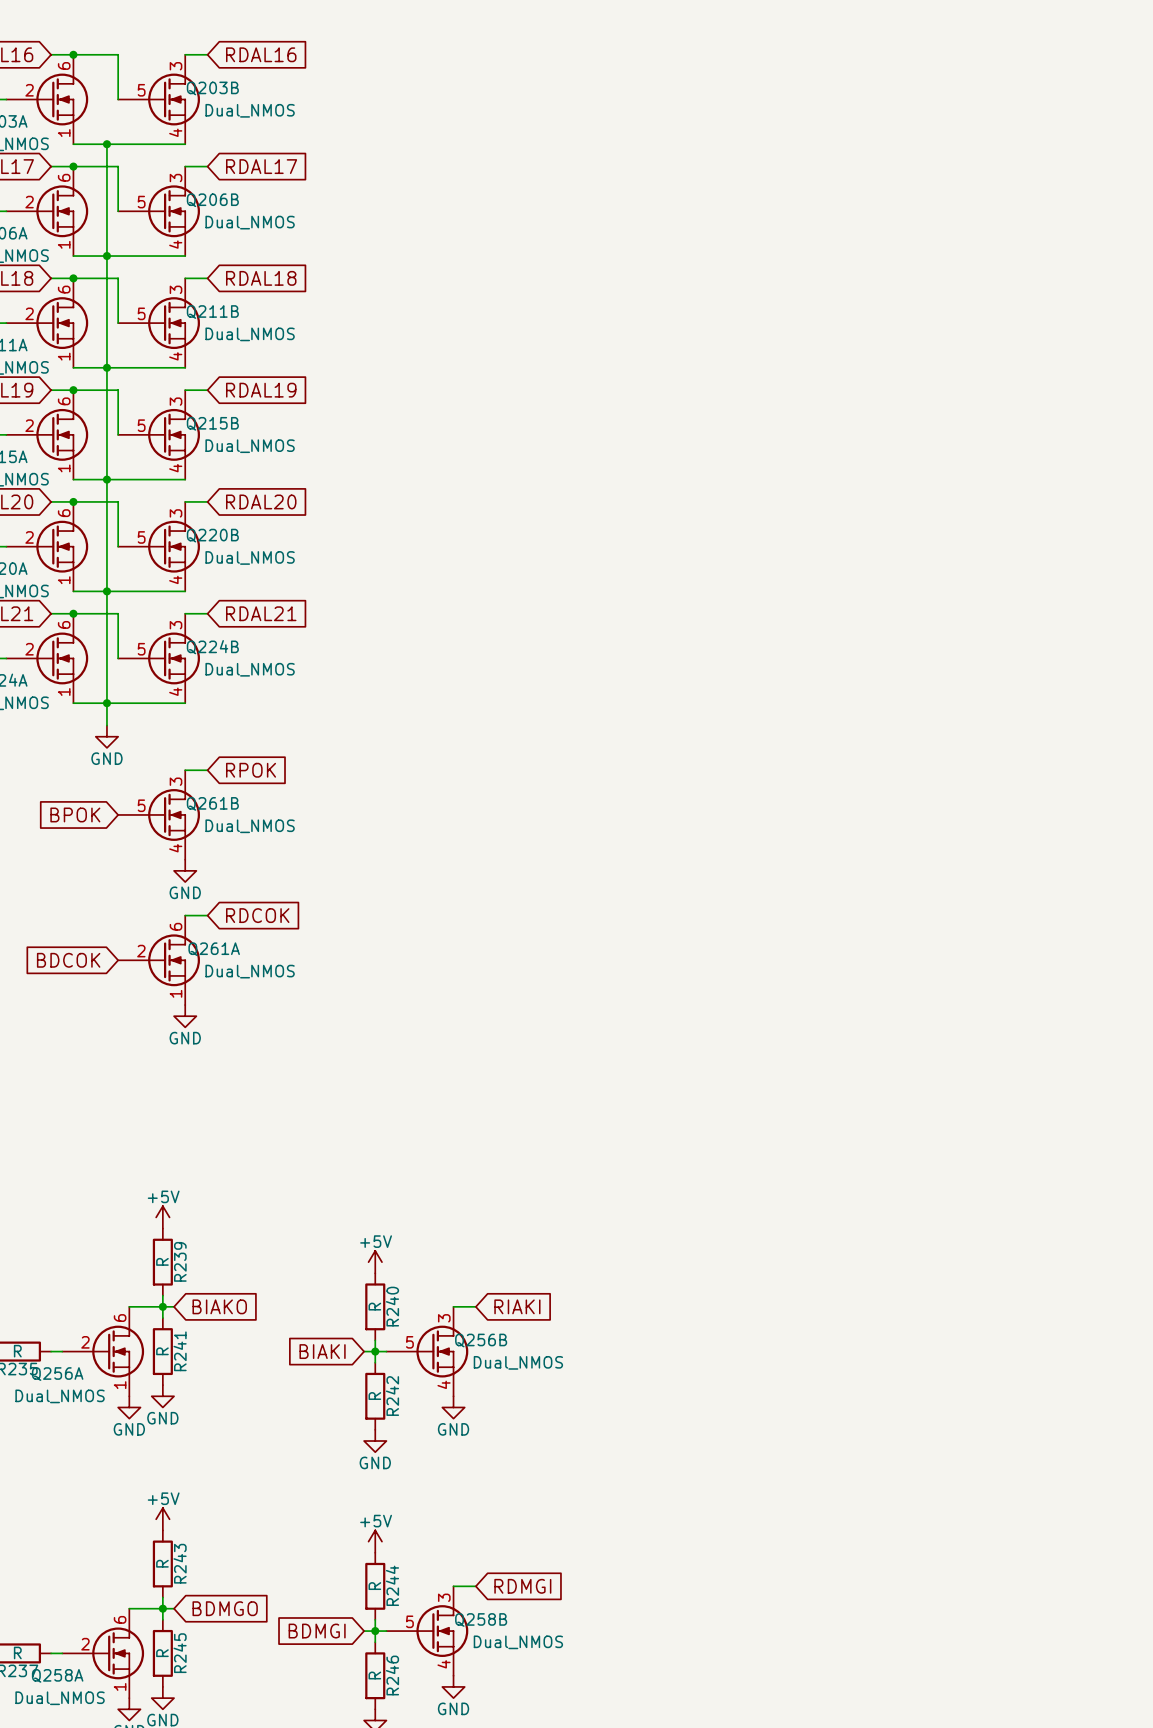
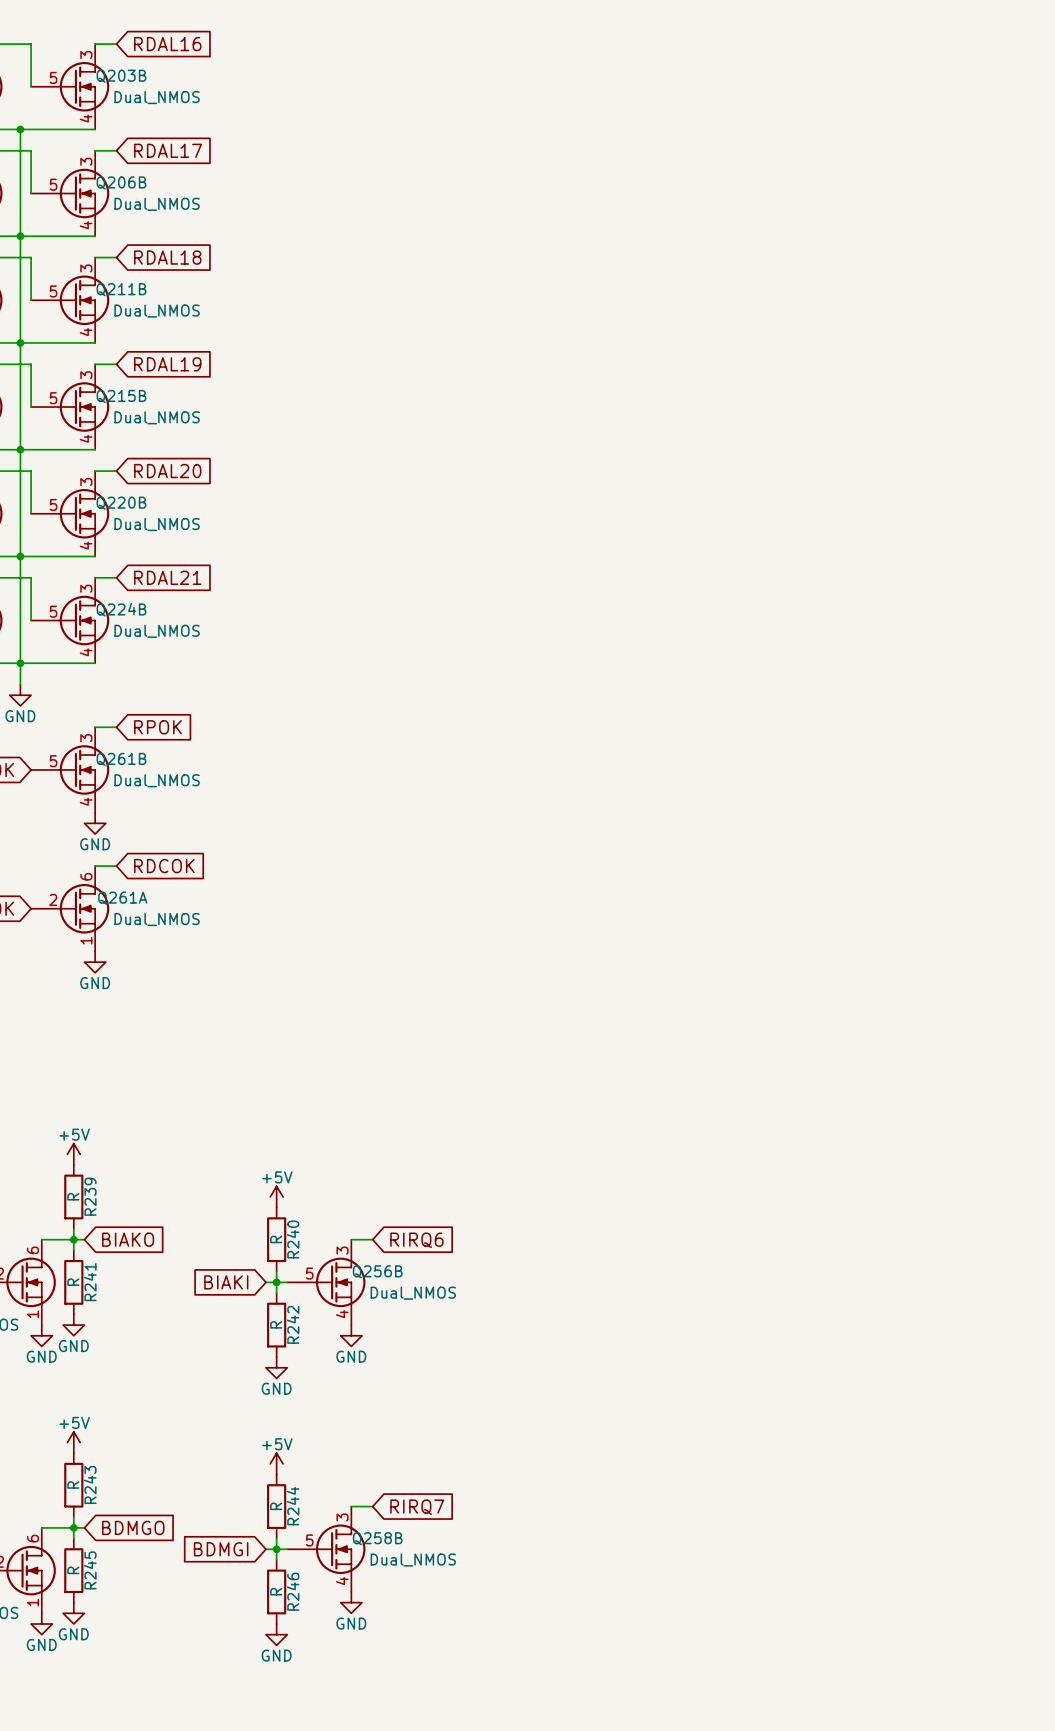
global label: RIAKI (517, 1306) -> RIRQ6 (416, 1240)
global label: RDMGI (522, 1586) -> RIRQ7 (417, 1507)

